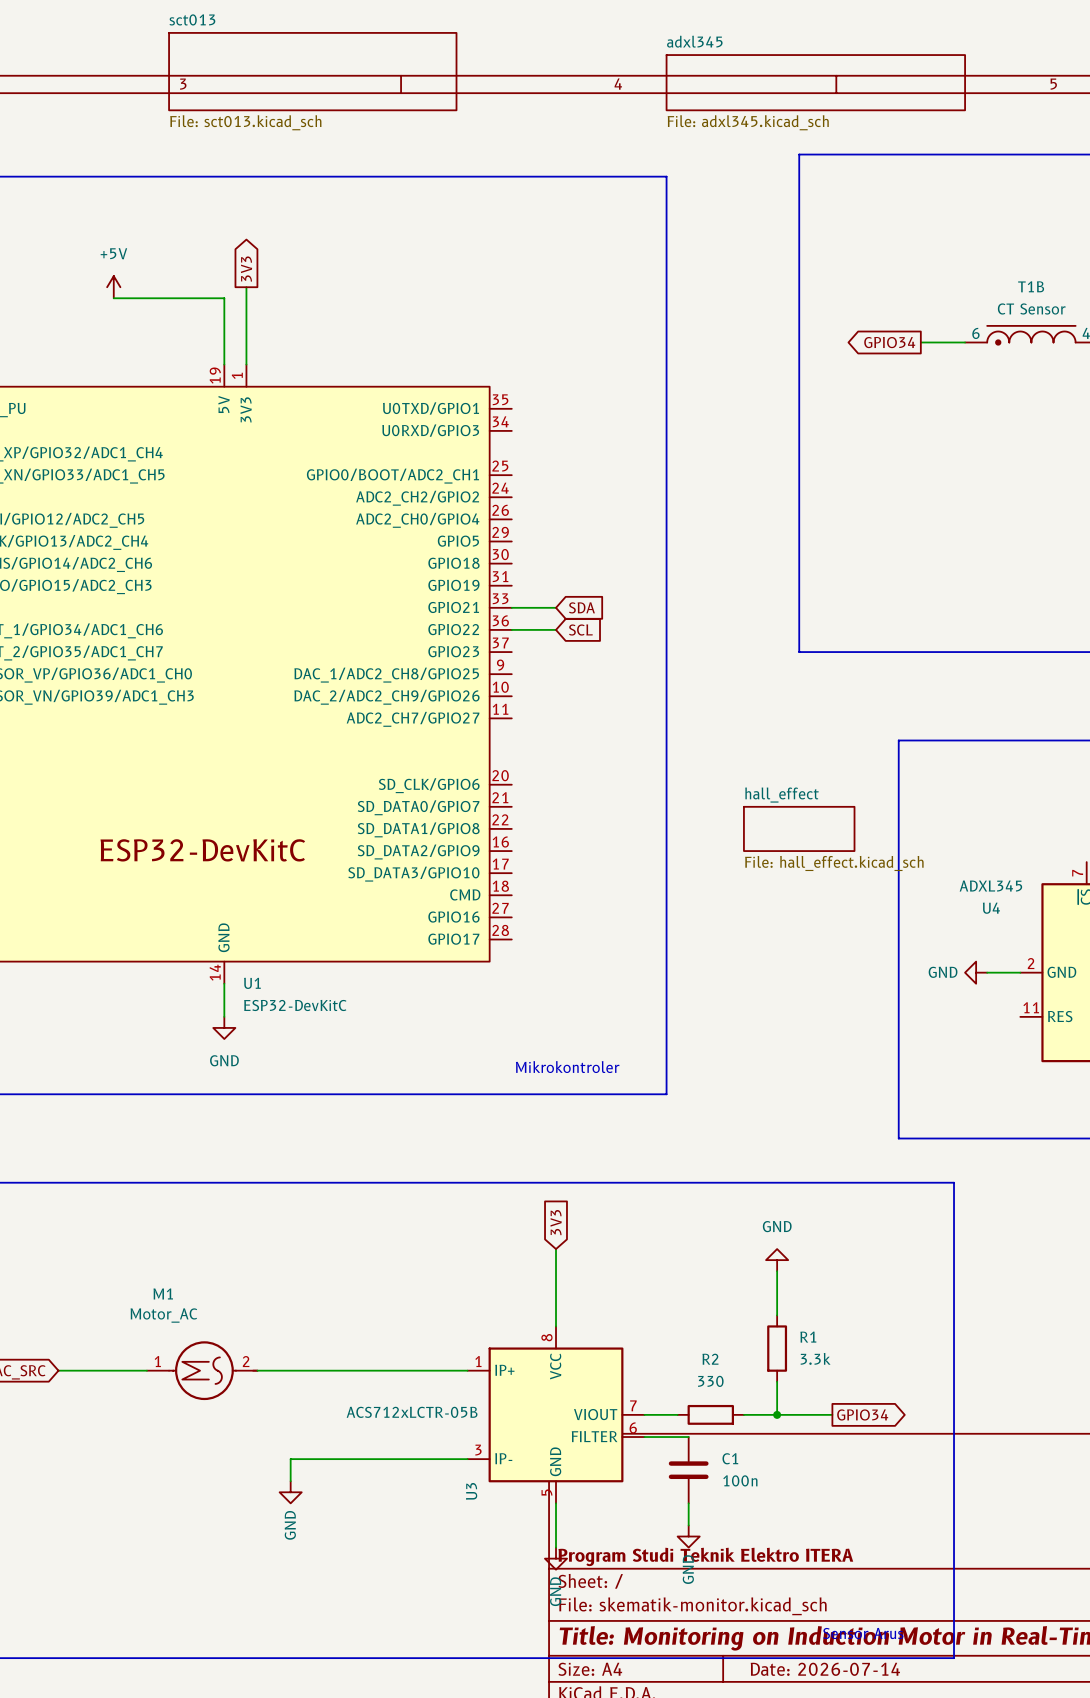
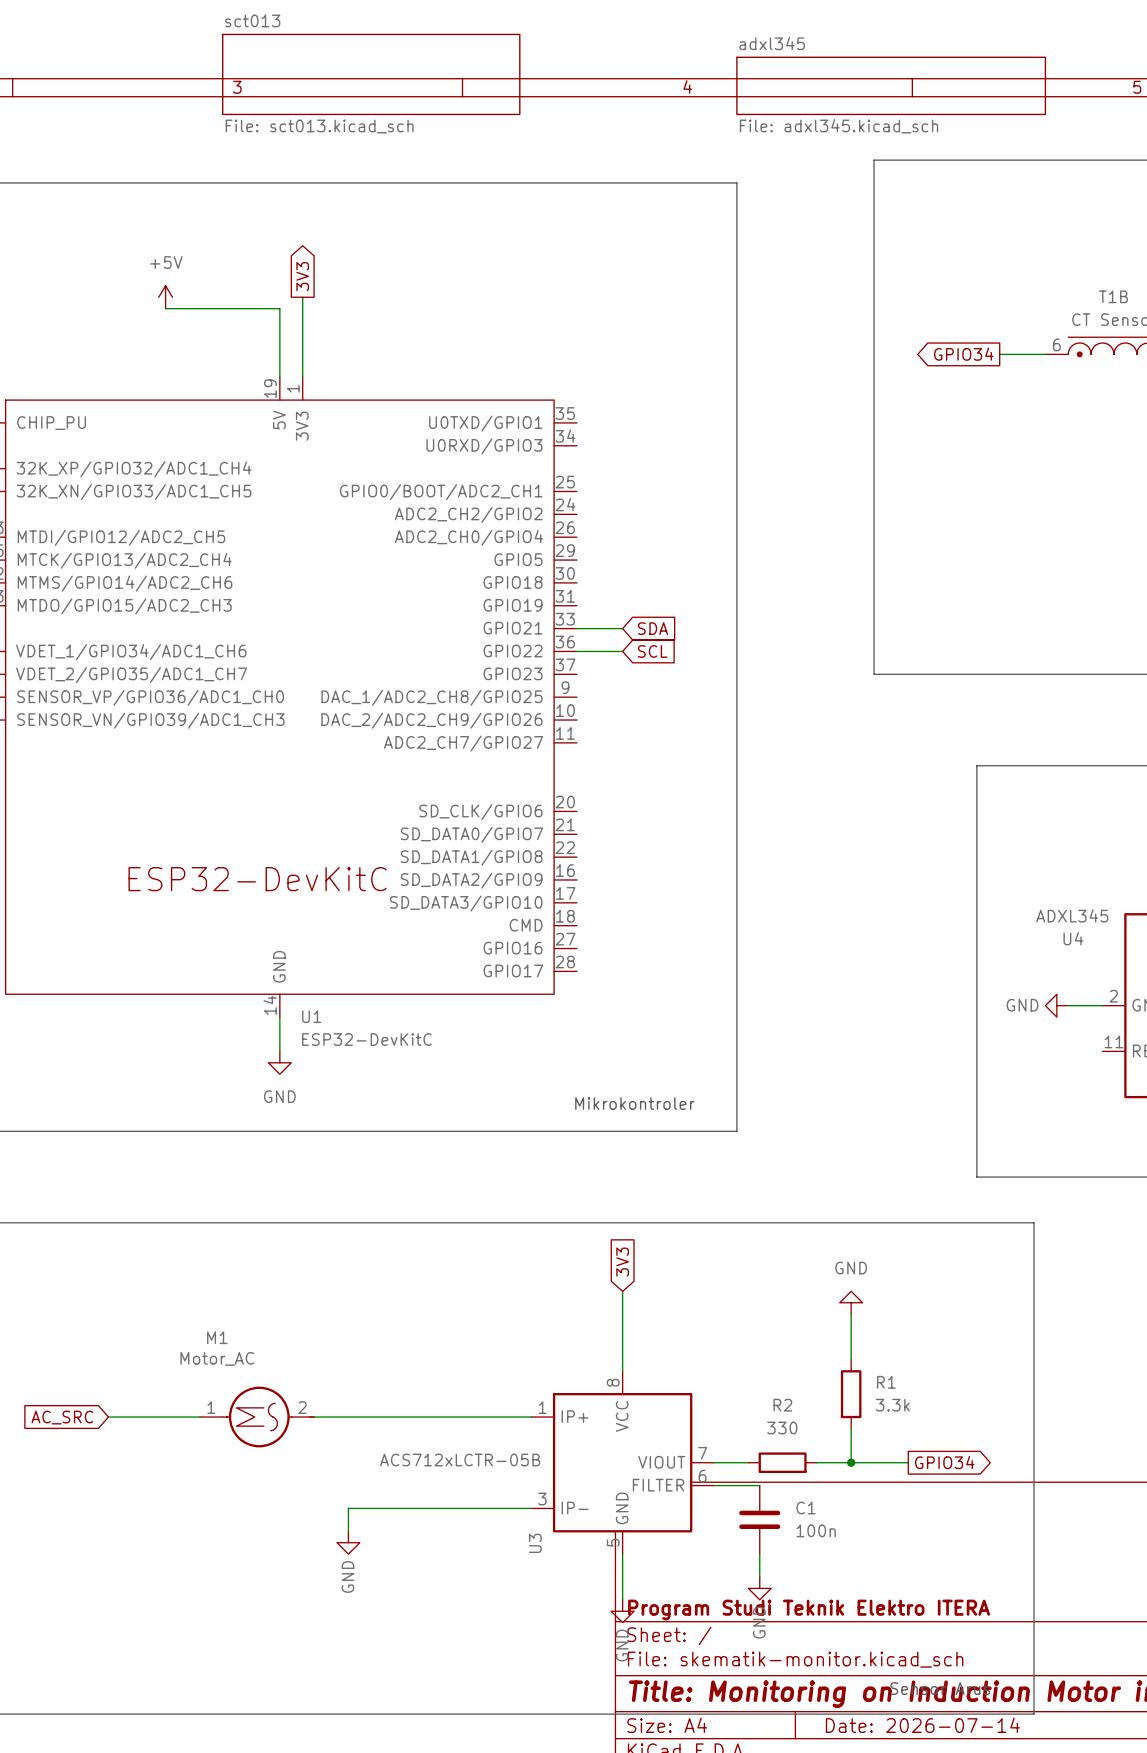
sheet hall_effect: File: hall_effect.kicad_sch (799, 828) -> none

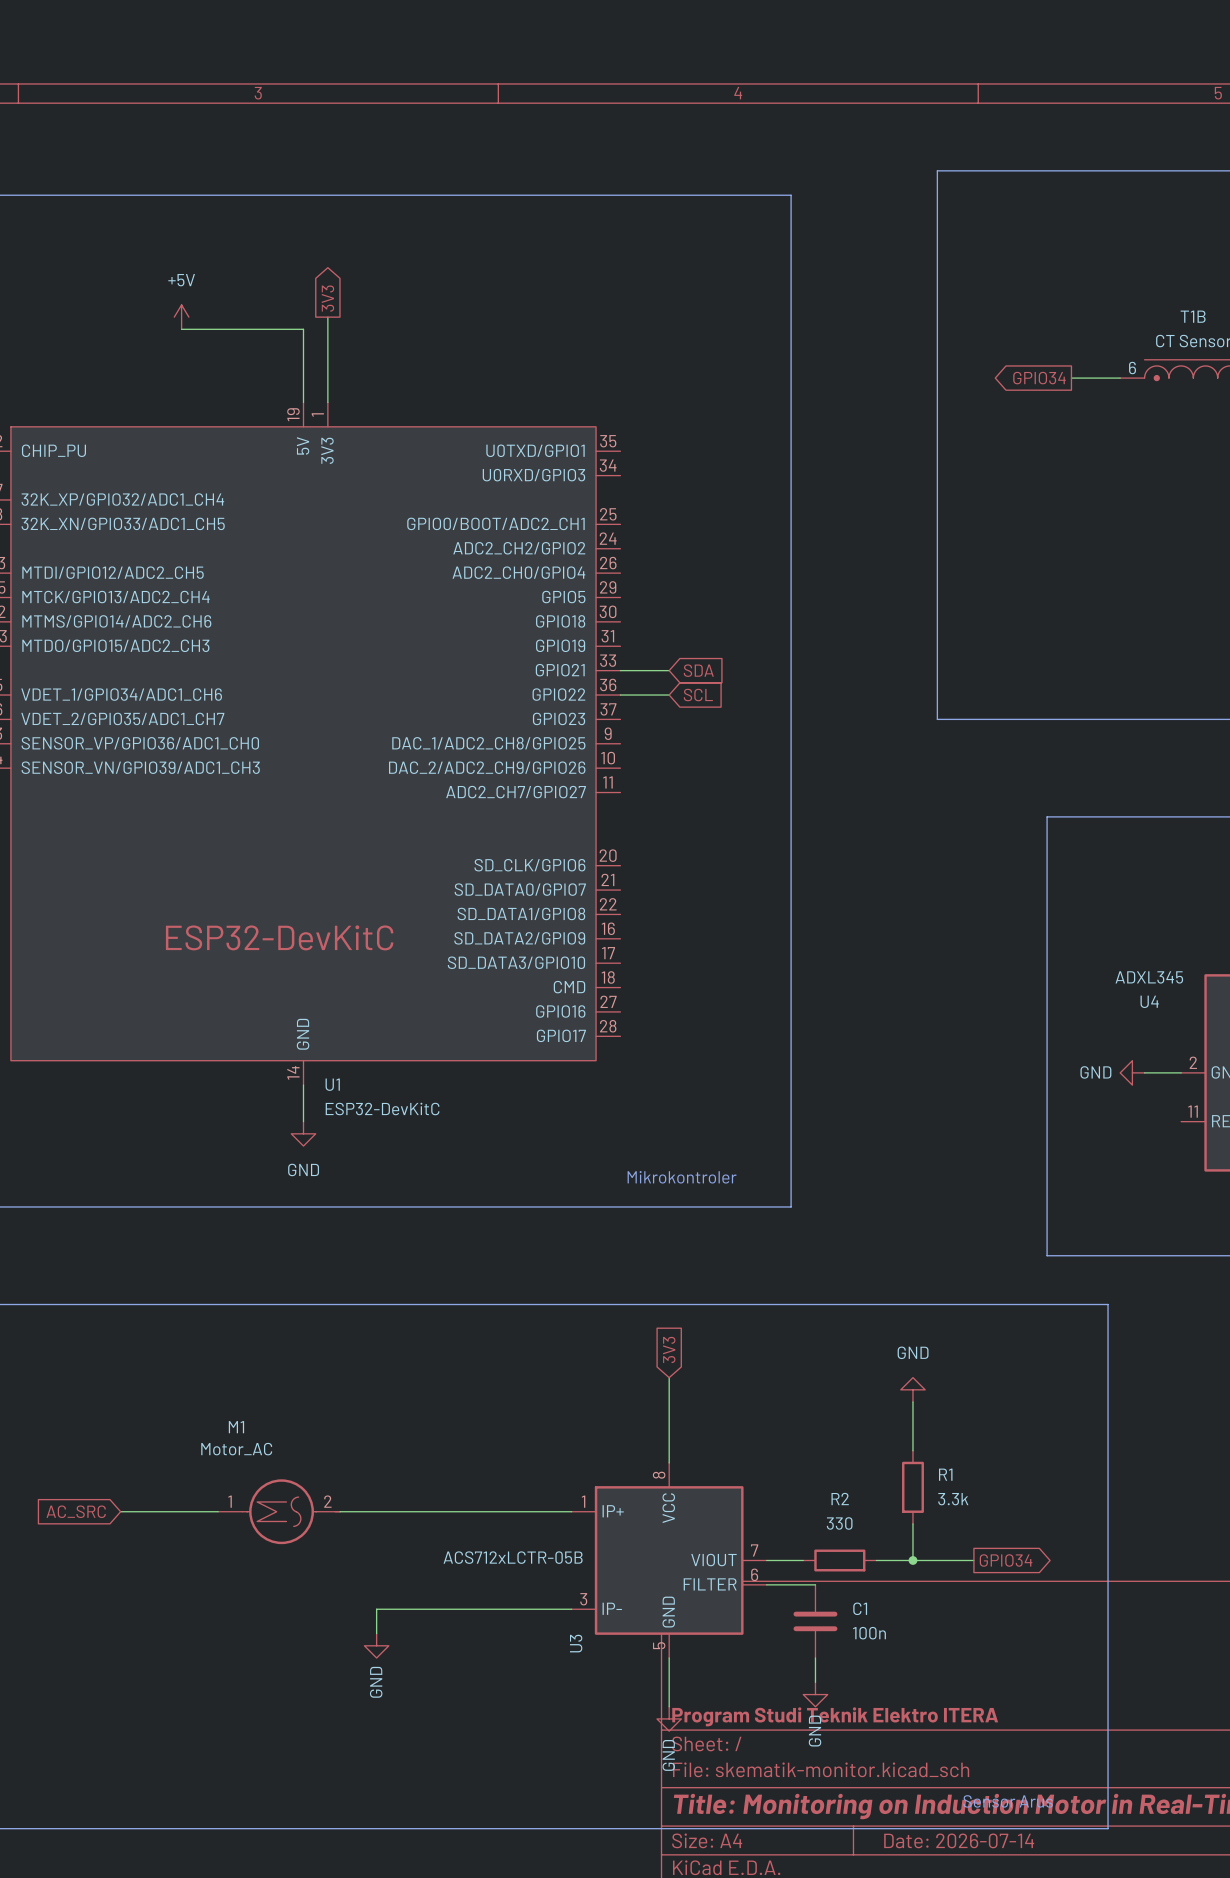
sheet sct013: File: sct013.kicad_sch (371, 74) -> none
sheet adxl345: File: adxl345.kicad_sch (891, 85) -> none

